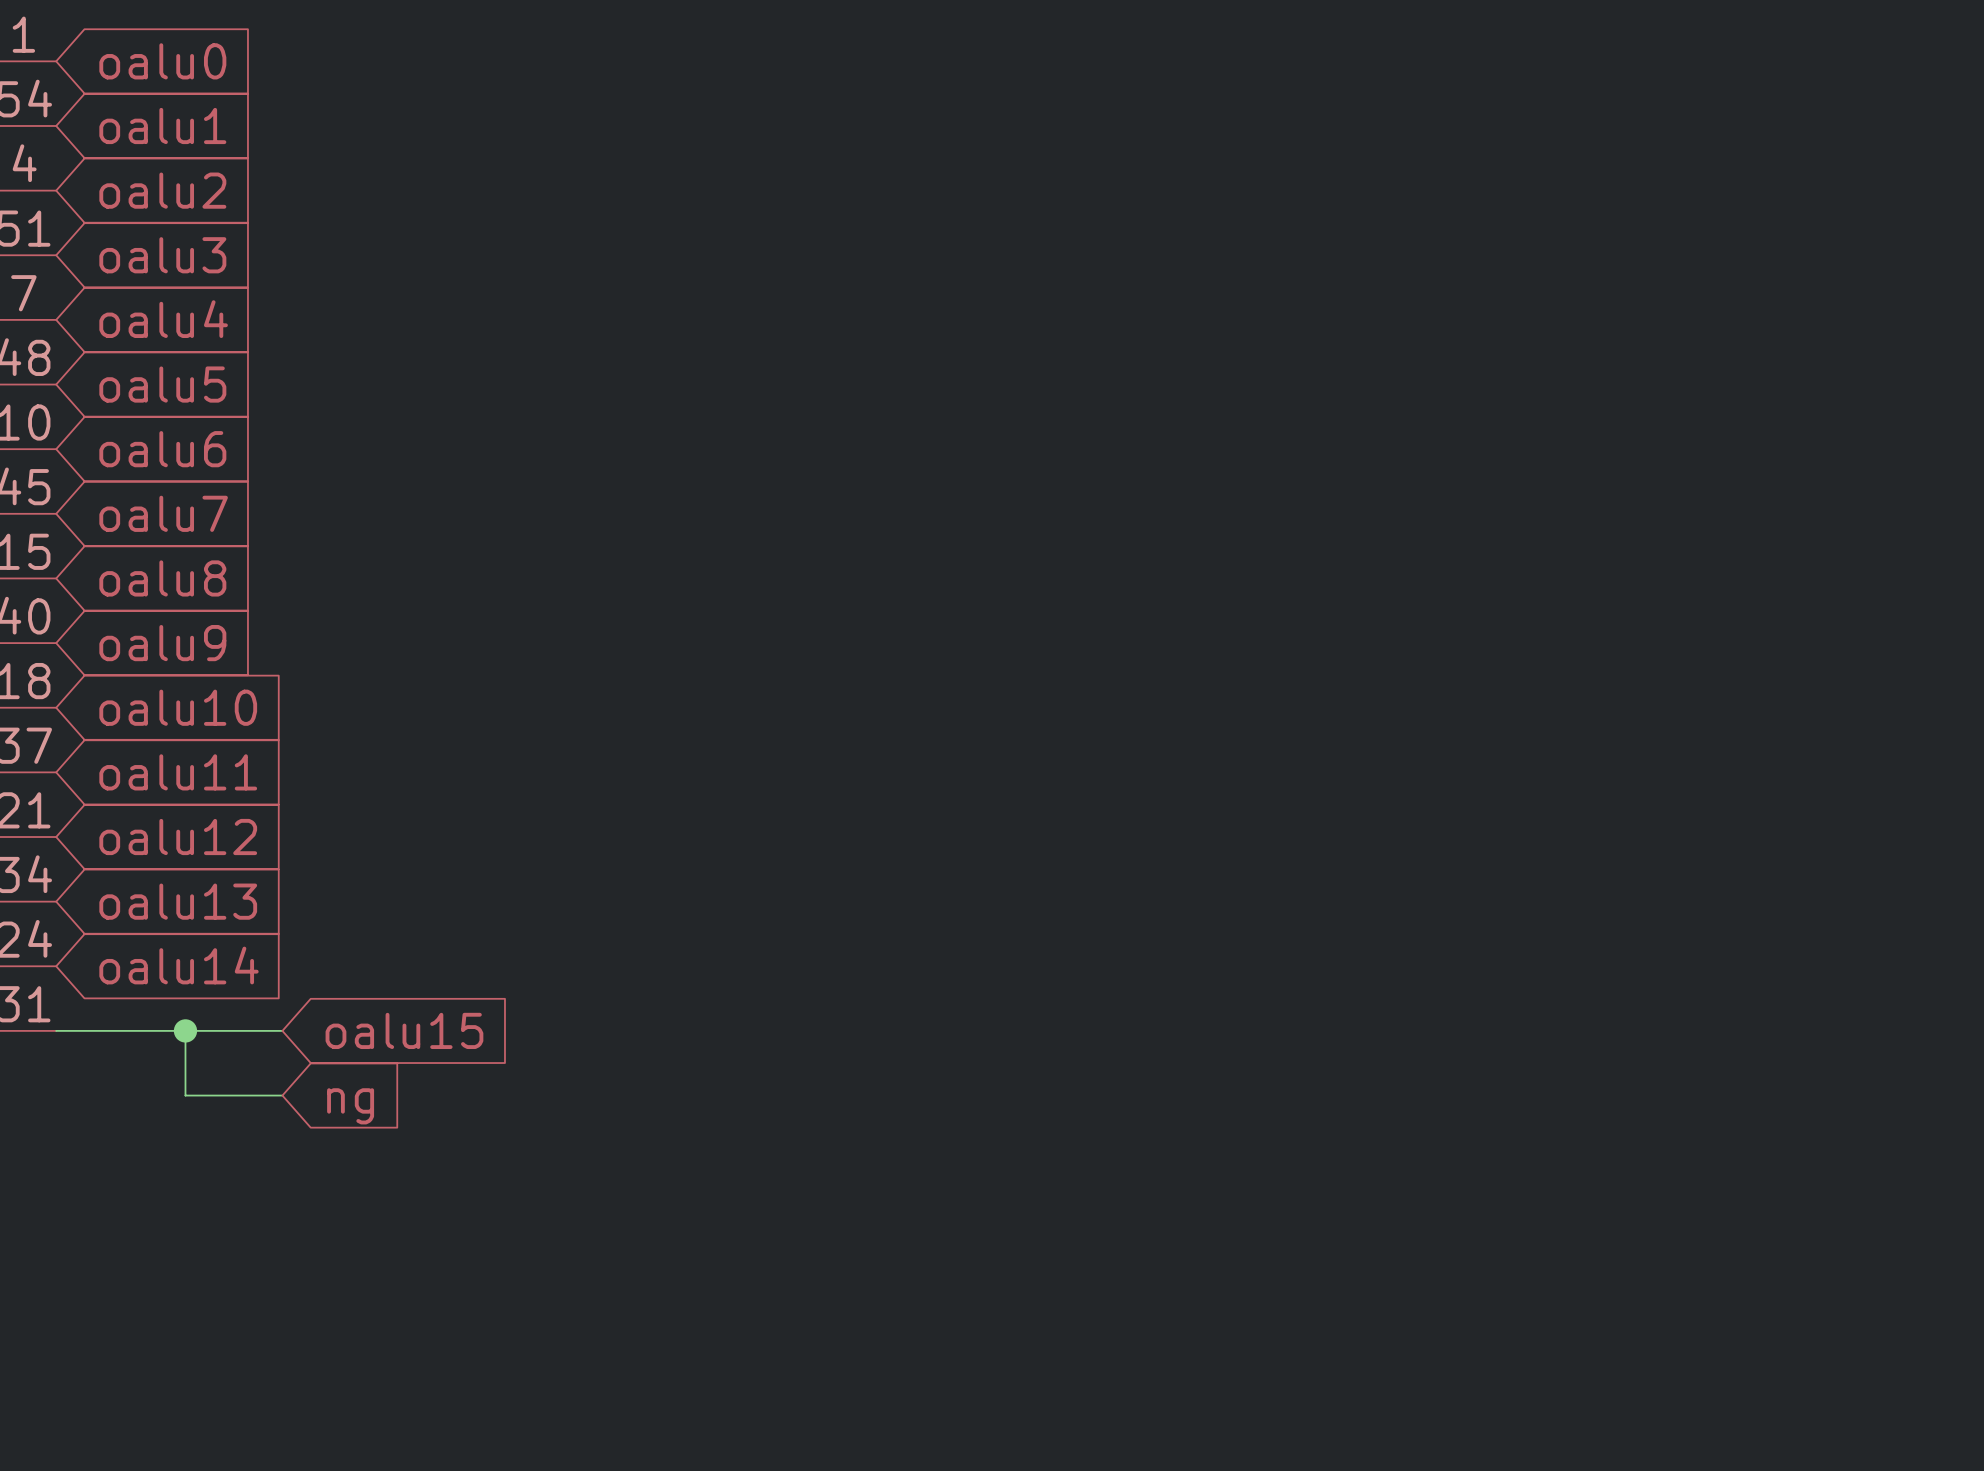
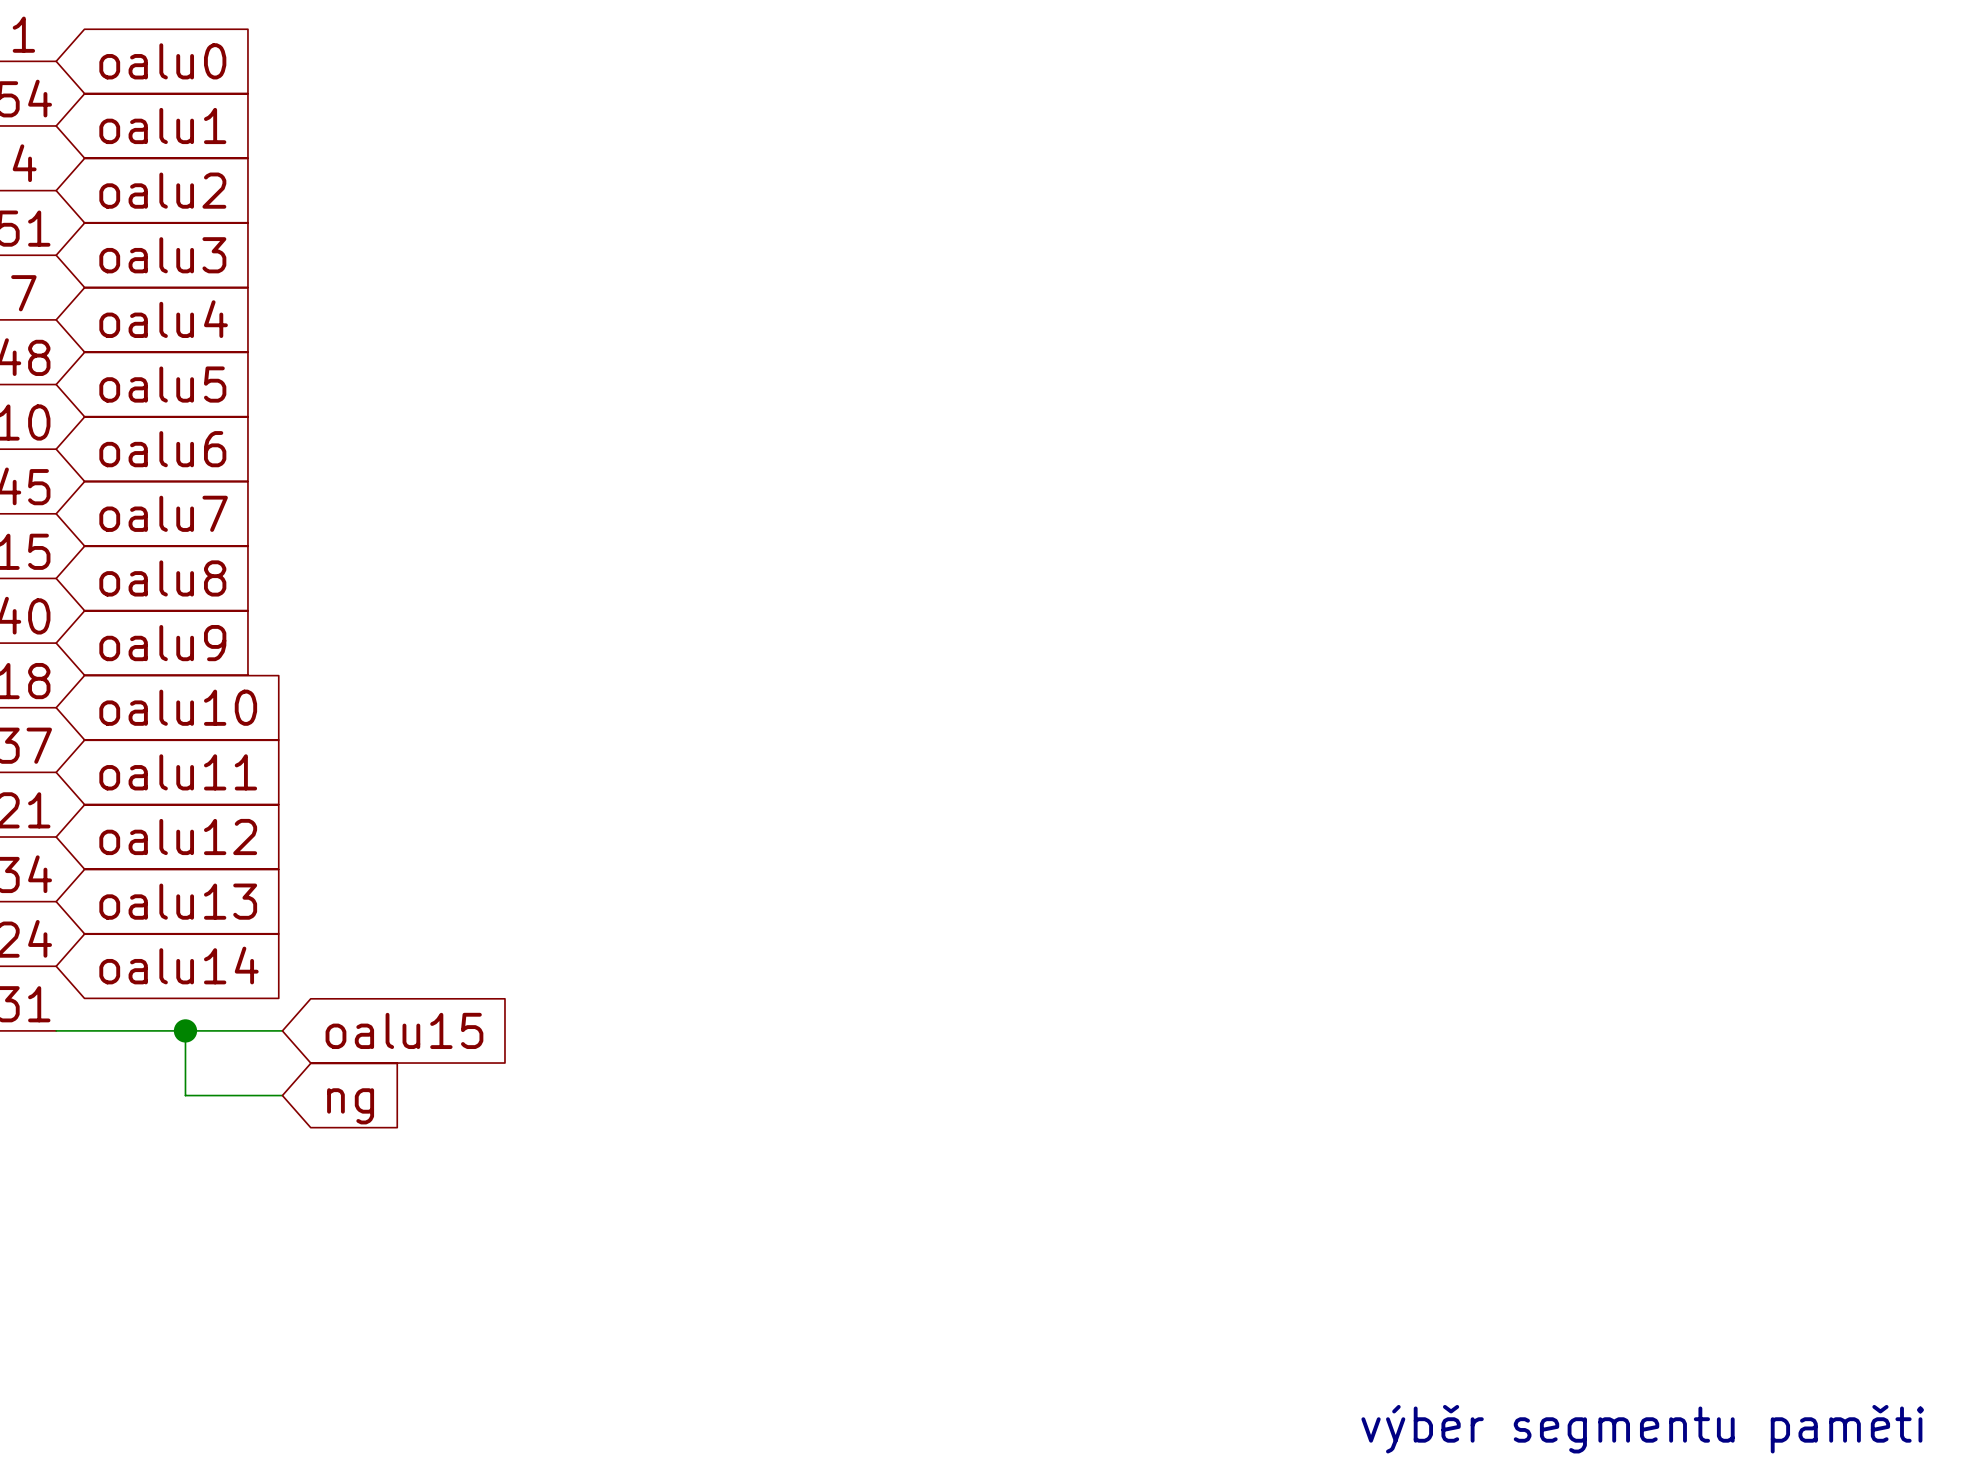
text: none -> výběr segmentu paměti (1642, 1429)

